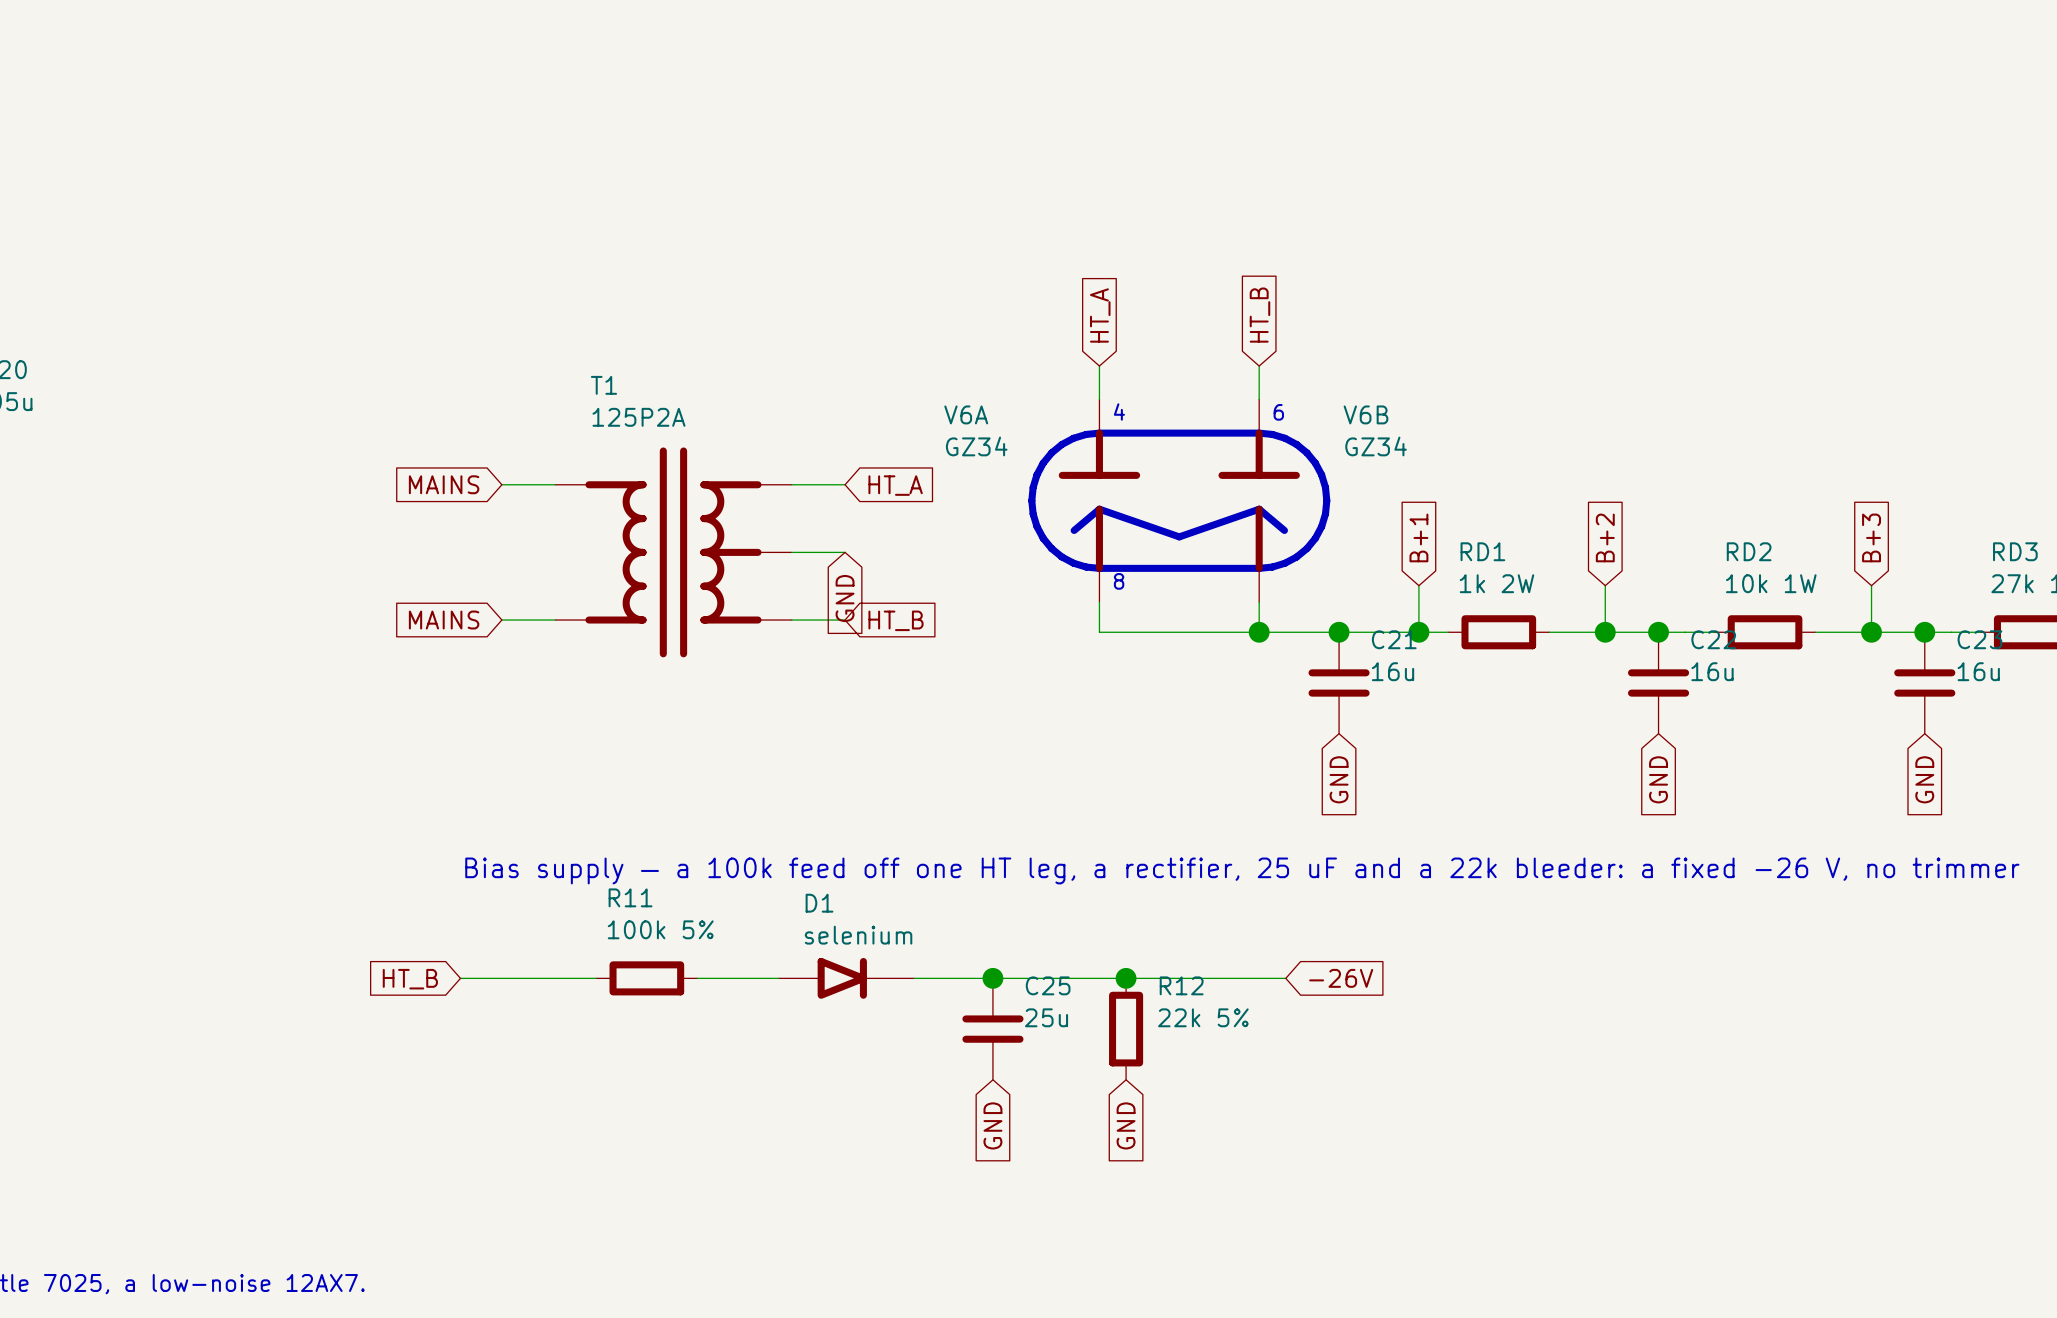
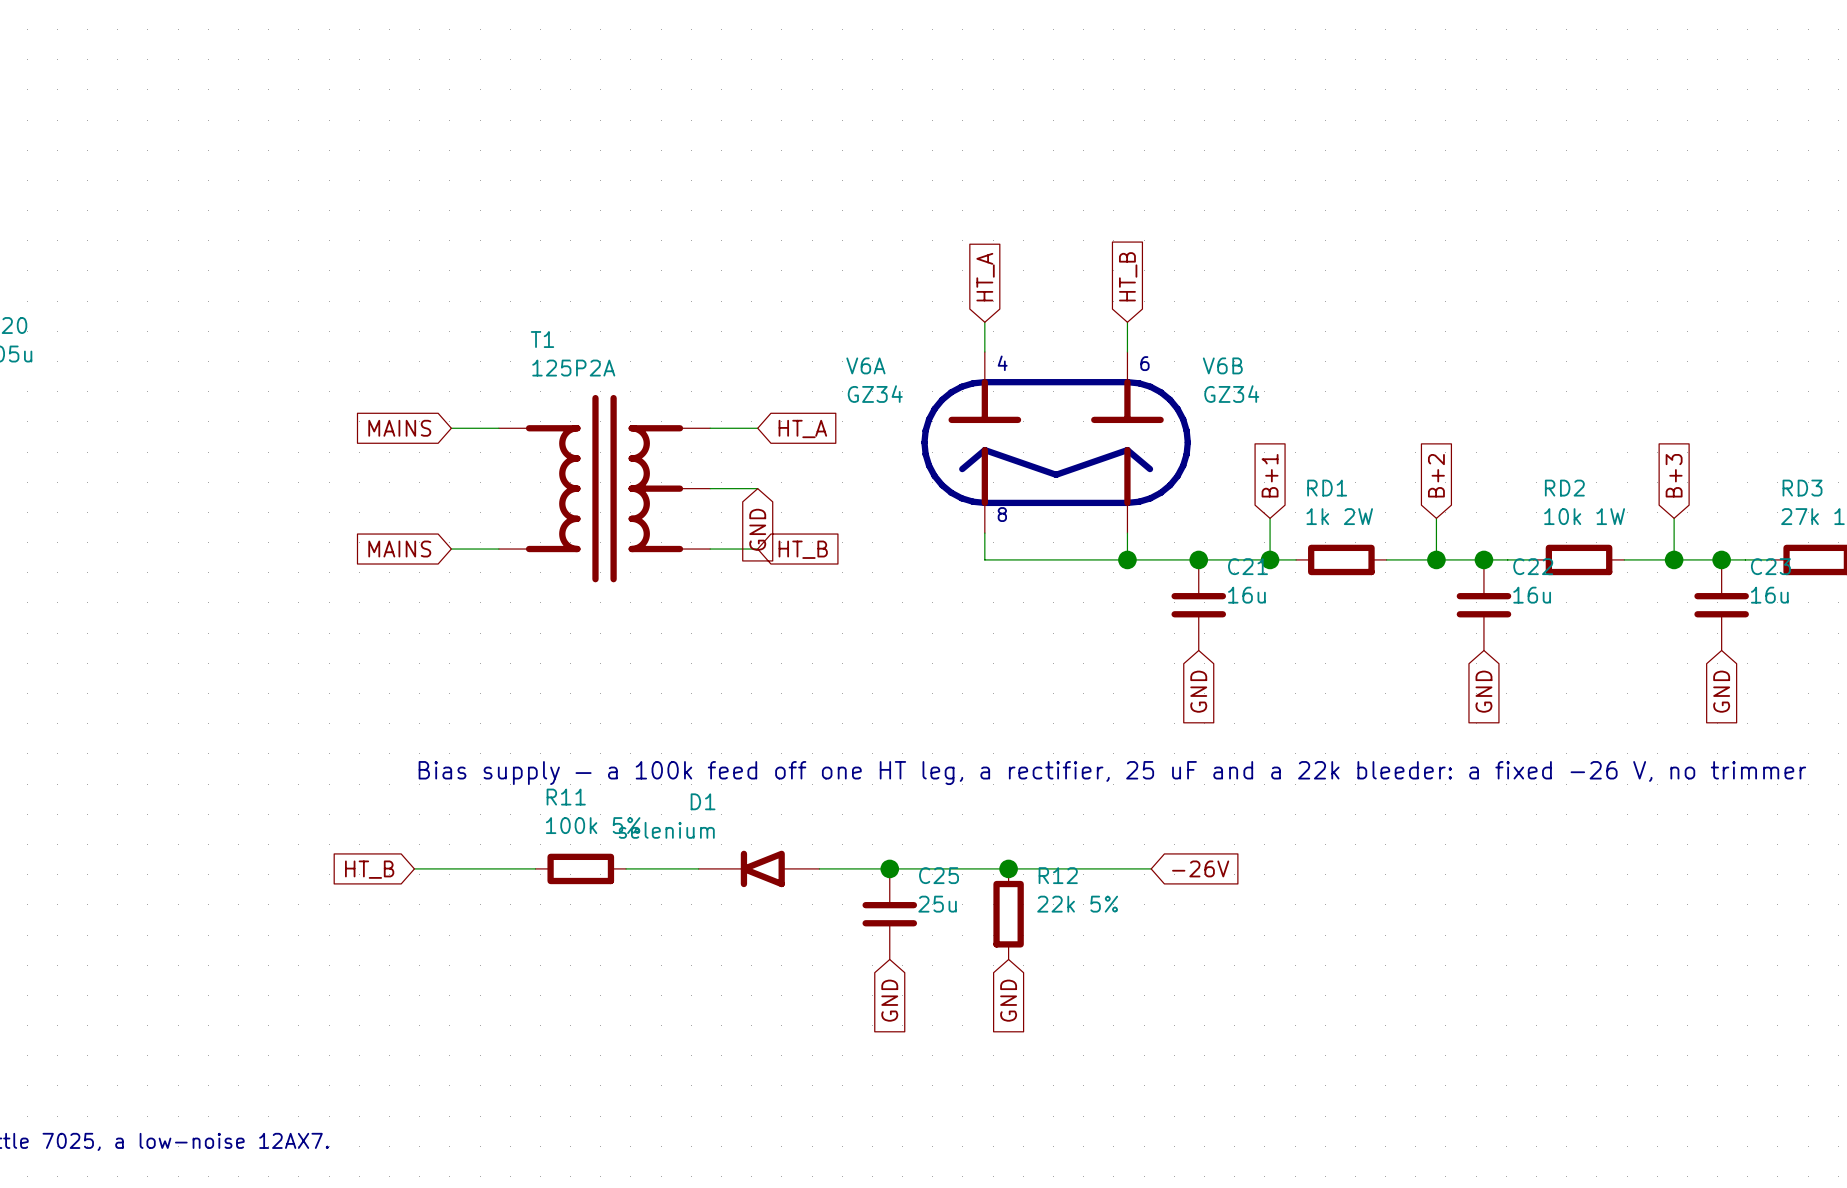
D1 name position: D1 (819, 903) -> D1 (703, 801)
D1 value position: selenium (858, 935) -> selenium (666, 830)
D1 rotation: 0° (842, 978) -> 180° (762, 868)

